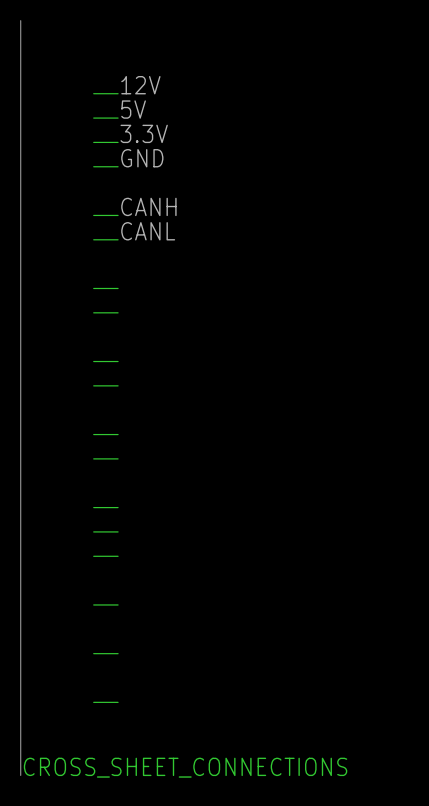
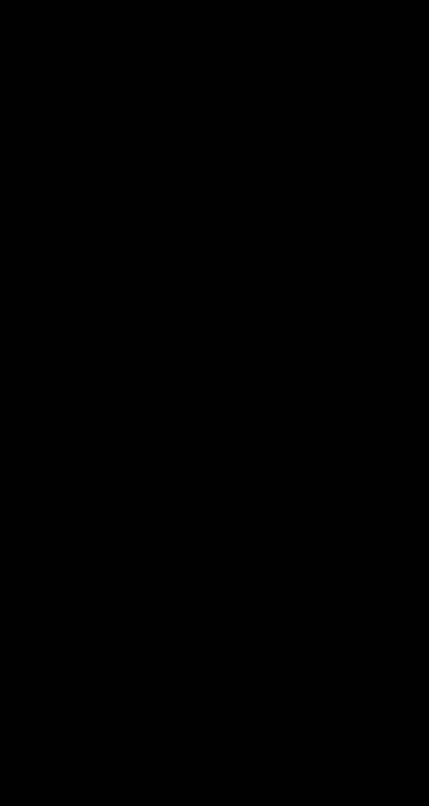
bus: (20, 20) (20, 775) -> none
label: 12V (140, 85) -> none
wire: (93, 93) (118, 93) -> none
label: 5V (133, 109) -> none
wire: (93, 118) (118, 118) -> none
label: 3.3V (144, 133) -> none
wire: (93, 142) (118, 142) -> none
label: GND (142, 158) -> none
wire: (93, 166) (118, 166) -> none
label: CANH (148, 206) -> none
wire: (93, 215) (118, 215) -> none
label: CANL (148, 231) -> none
wire: (93, 239) (118, 239) -> none
wire: (93, 288) (118, 288) -> none
wire: (93, 312) (118, 312) -> none
wire: (93, 361) (118, 361) -> none
wire: (93, 385) (118, 385) -> none
wire: (93, 434) (118, 434) -> none
wire: (93, 458) (118, 458) -> none
wire: (93, 507) (118, 507) -> none
wire: (93, 531) (118, 531) -> none
wire: (93, 556) (118, 556) -> none
wire: (93, 604) (118, 604) -> none
wire: (93, 653) (118, 653) -> none
wire: (93, 702) (118, 702) -> none
text: CROSS_SHEET_CONNECTIONS (185, 767) -> none

